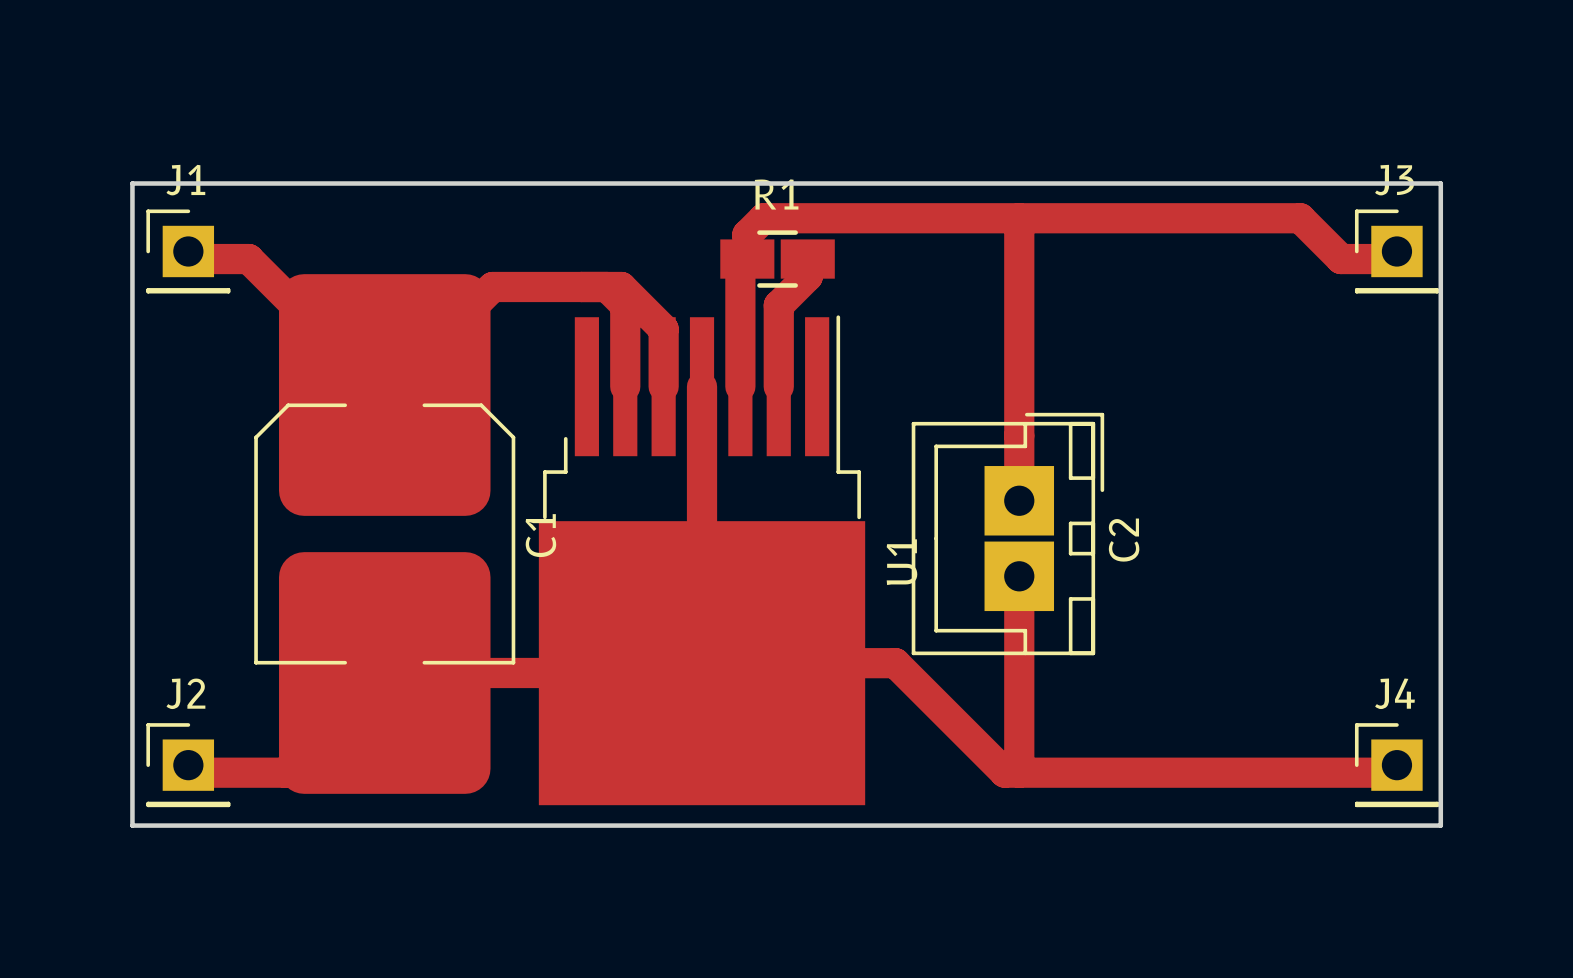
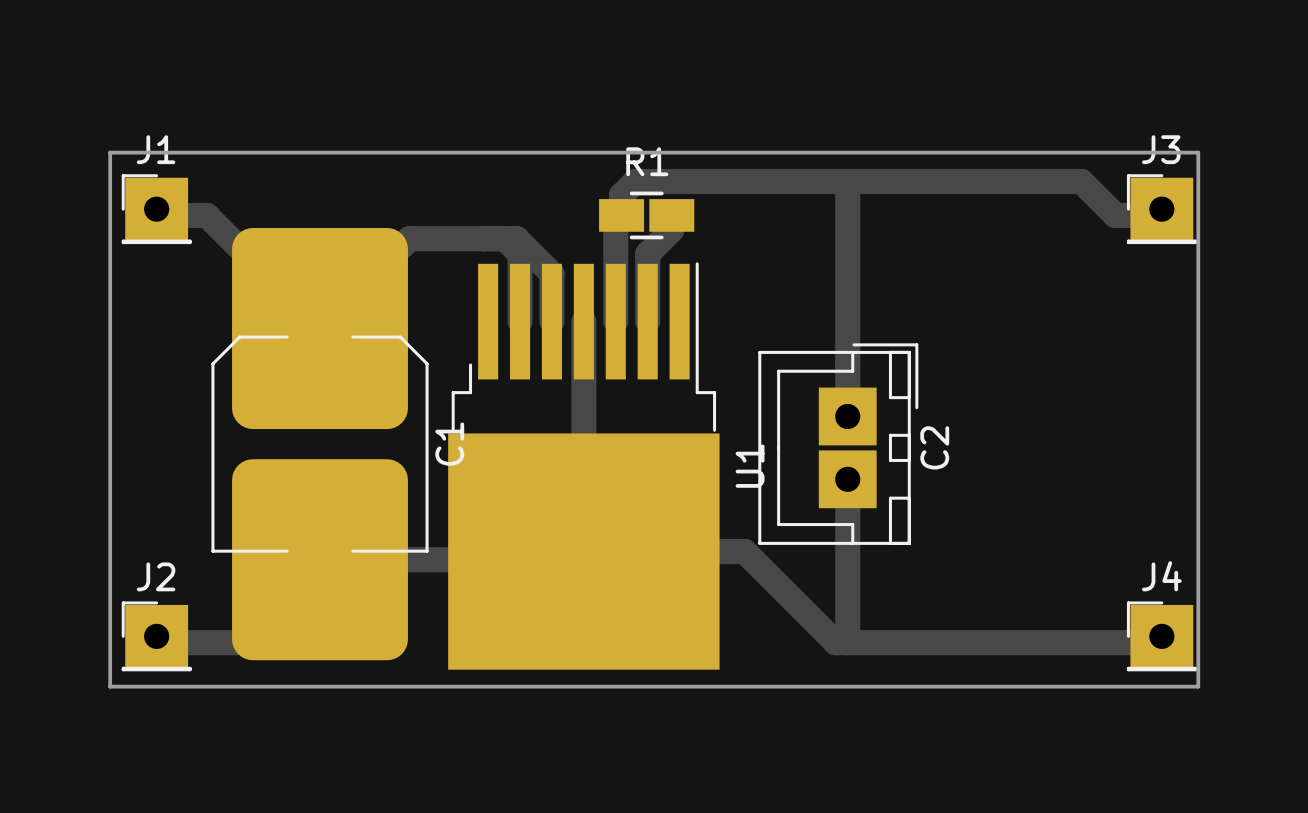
J1 footprint: [146, 209, 231, 294] -> [121, 174, 192, 245]
J3 footprint: [1354, 209, 1439, 294] -> [1126, 174, 1197, 245]
J2 footprint: [146, 723, 231, 808] -> [121, 601, 192, 672]
J4 footprint: [1354, 723, 1439, 808] -> [1126, 601, 1197, 672]

